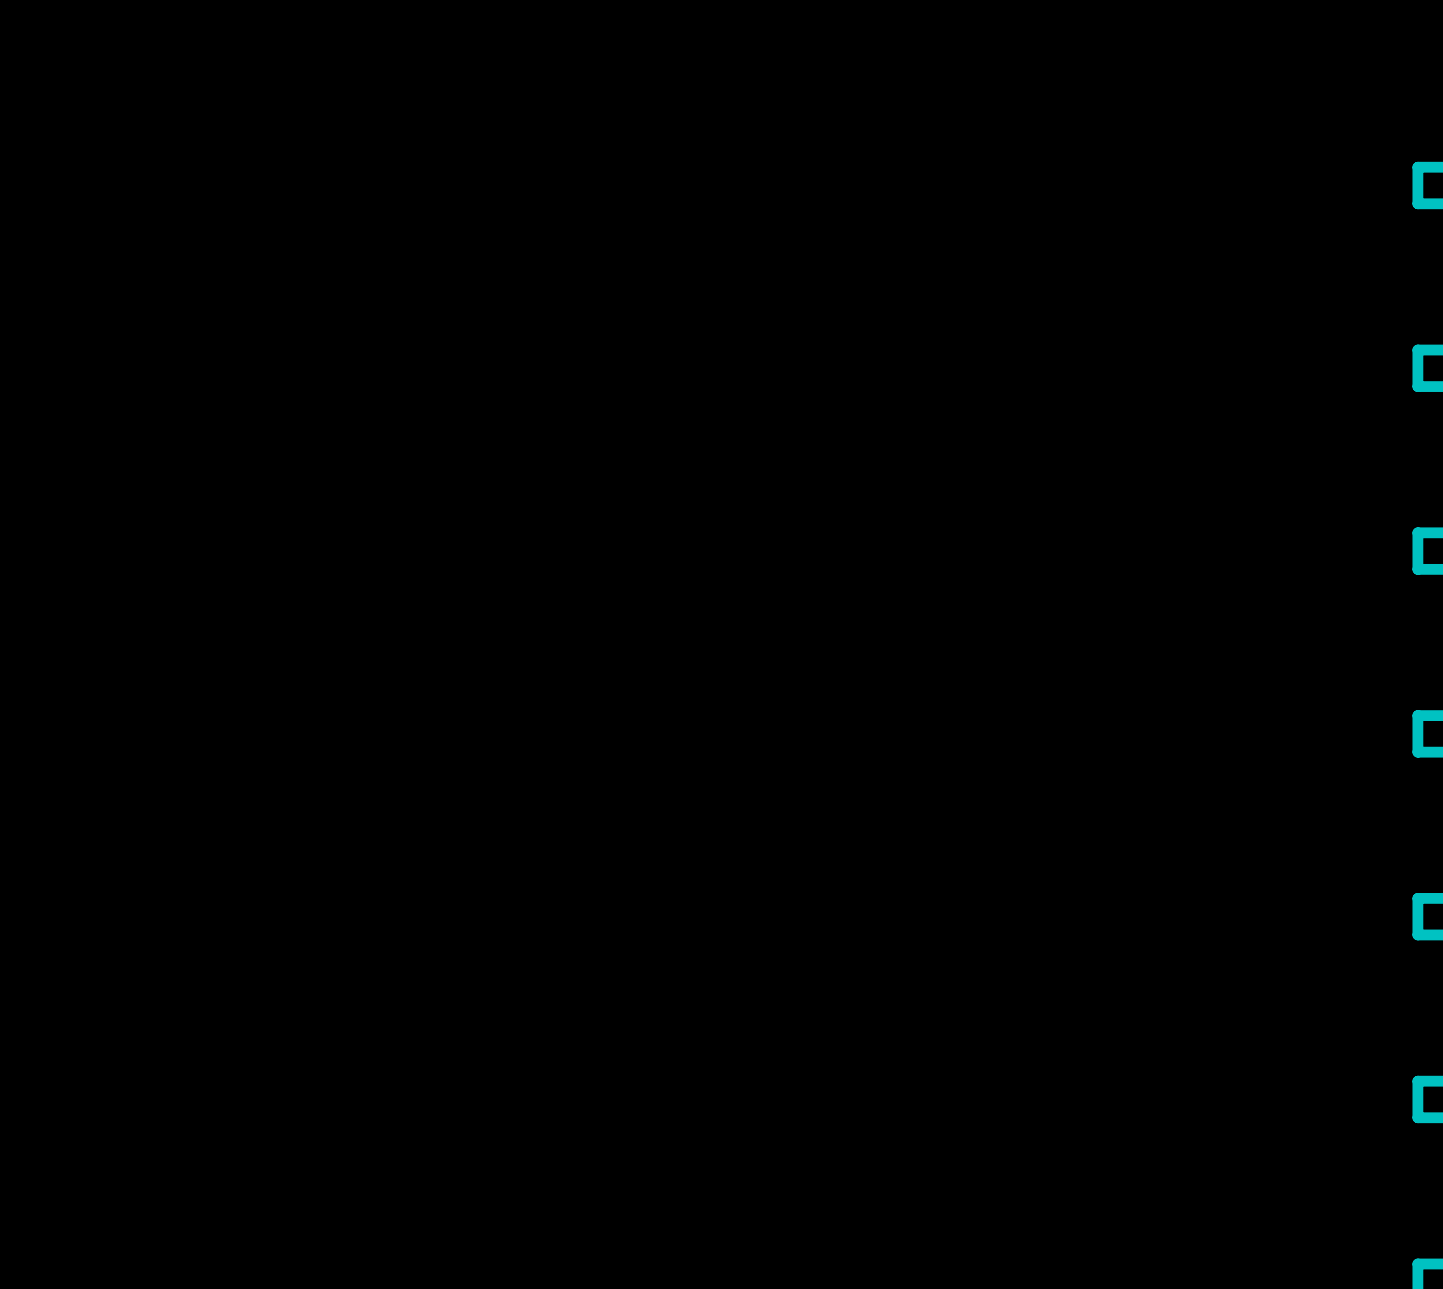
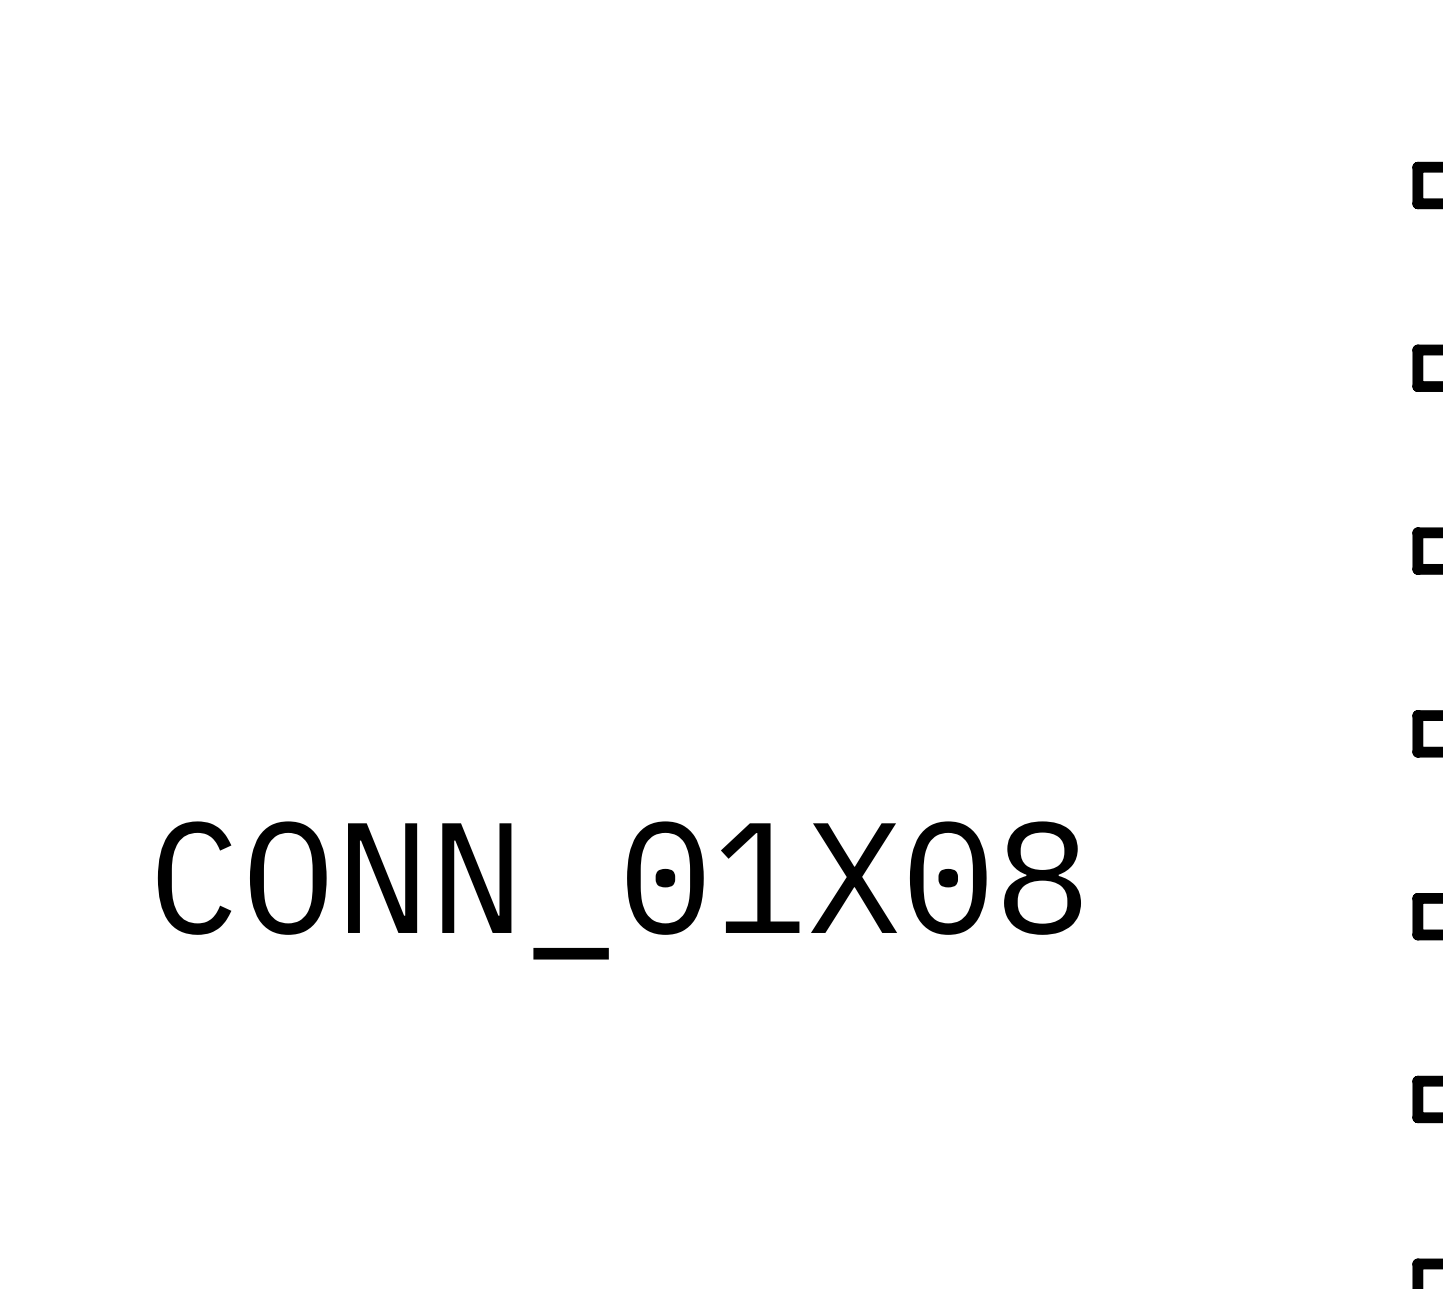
part value: none -> CONN_01X08 (619, 890)

